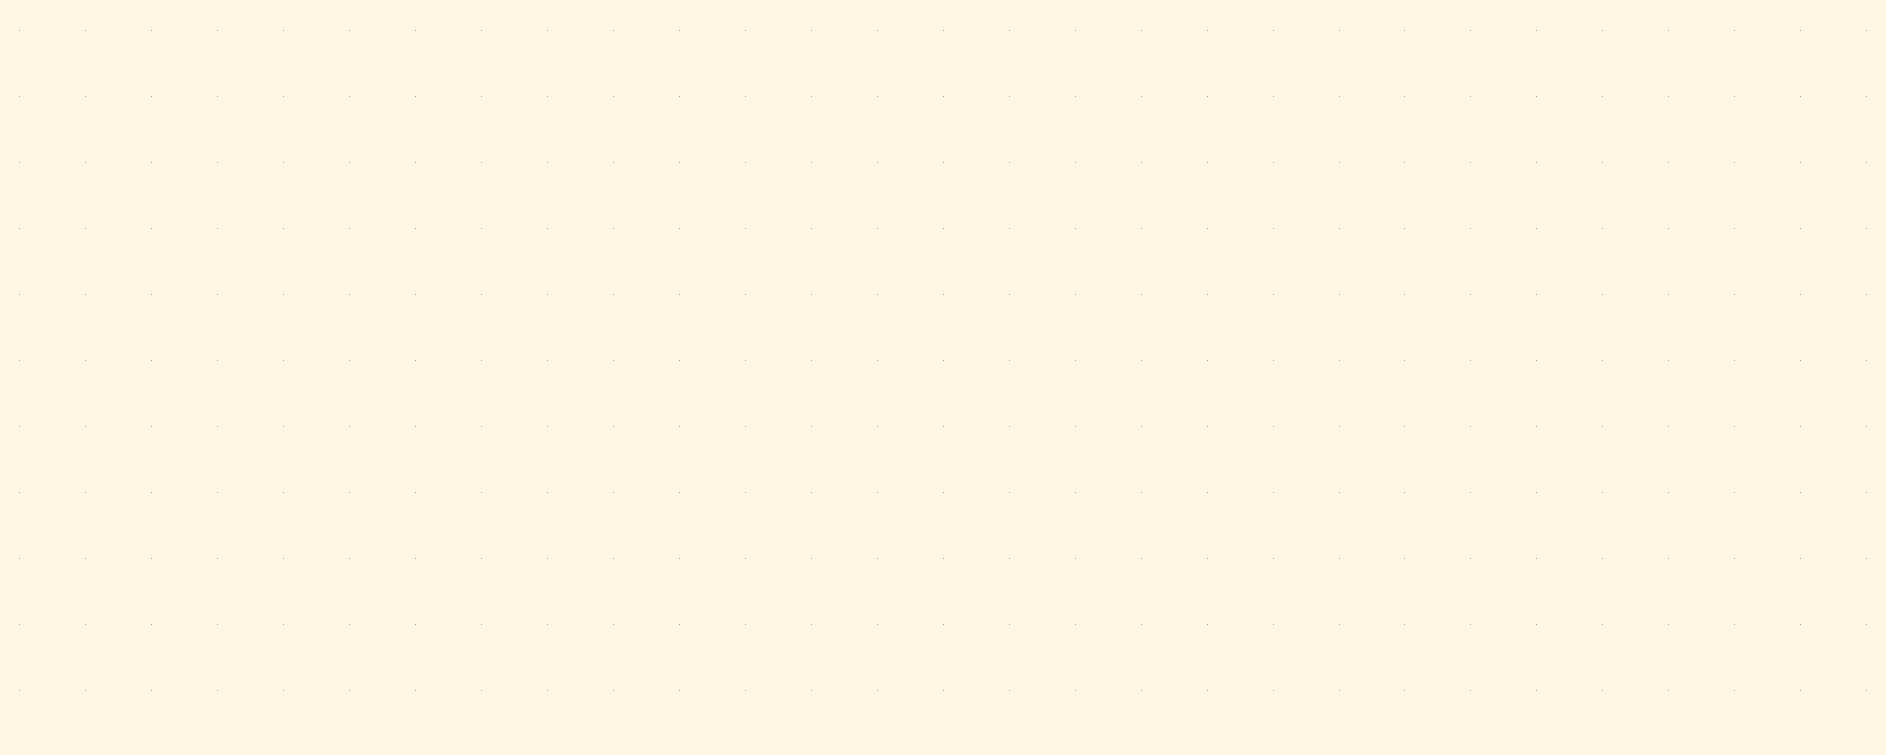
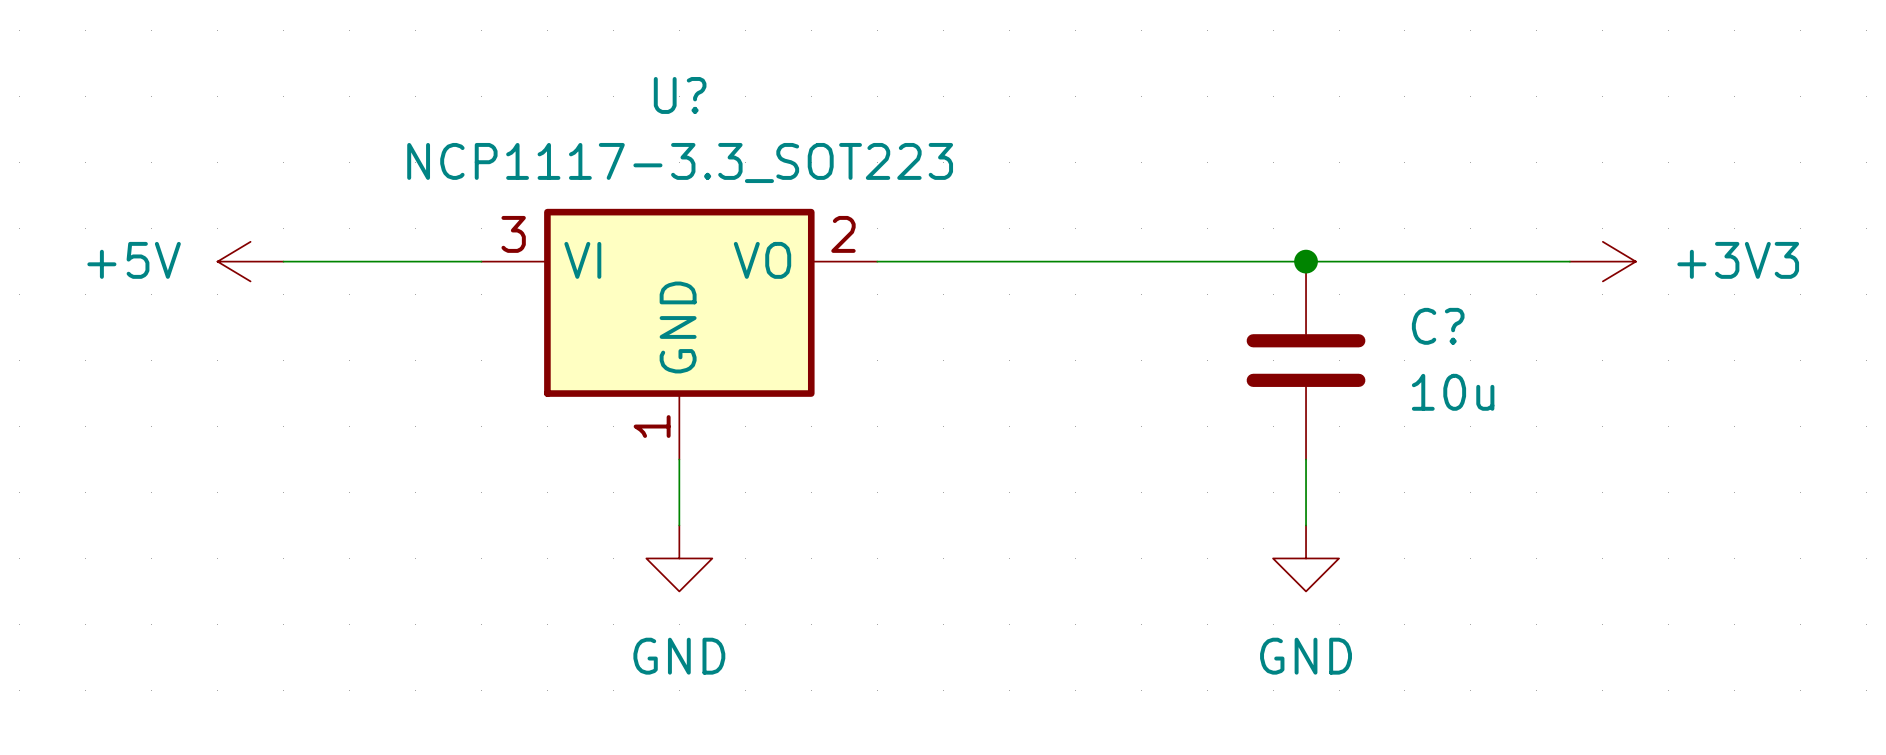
power symbol: none -> +5V (250, 261)
wire: none -> (283, 261) (481, 261)
wire: none -> (877, 261) (1569, 261)
junction: none -> (1306, 261)
power symbol: none -> +3V3 (1602, 261)
U?: none -> NCP1117-3.3_SOT223 (679, 334)
C?: none -> 10u (1306, 360)
wire: none -> (679, 459) (679, 525)
wire: none -> (1306, 459) (1306, 525)
power symbol: none -> GND (679, 558)
power symbol: none -> GND (1306, 558)

